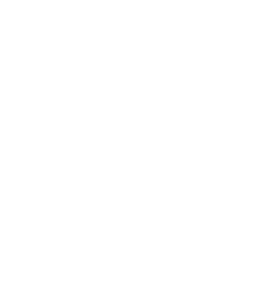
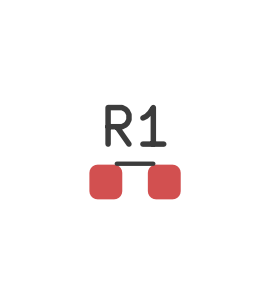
R1: none -> (135, 180)

